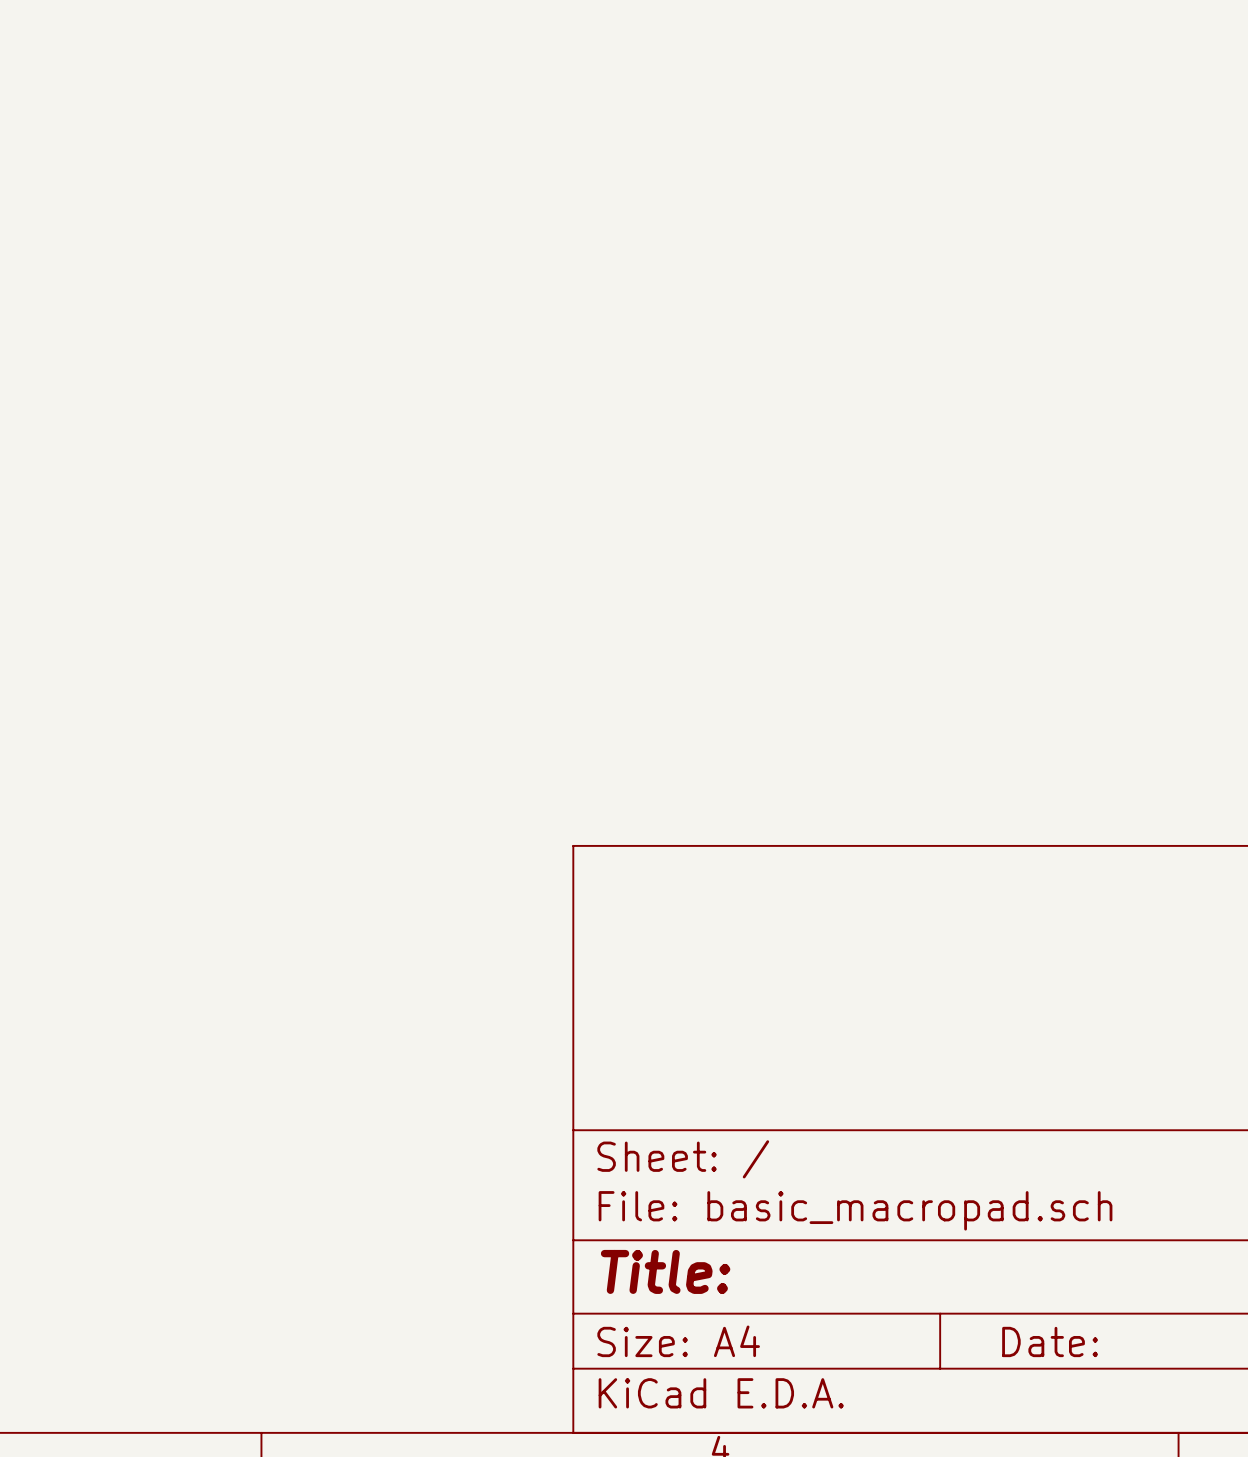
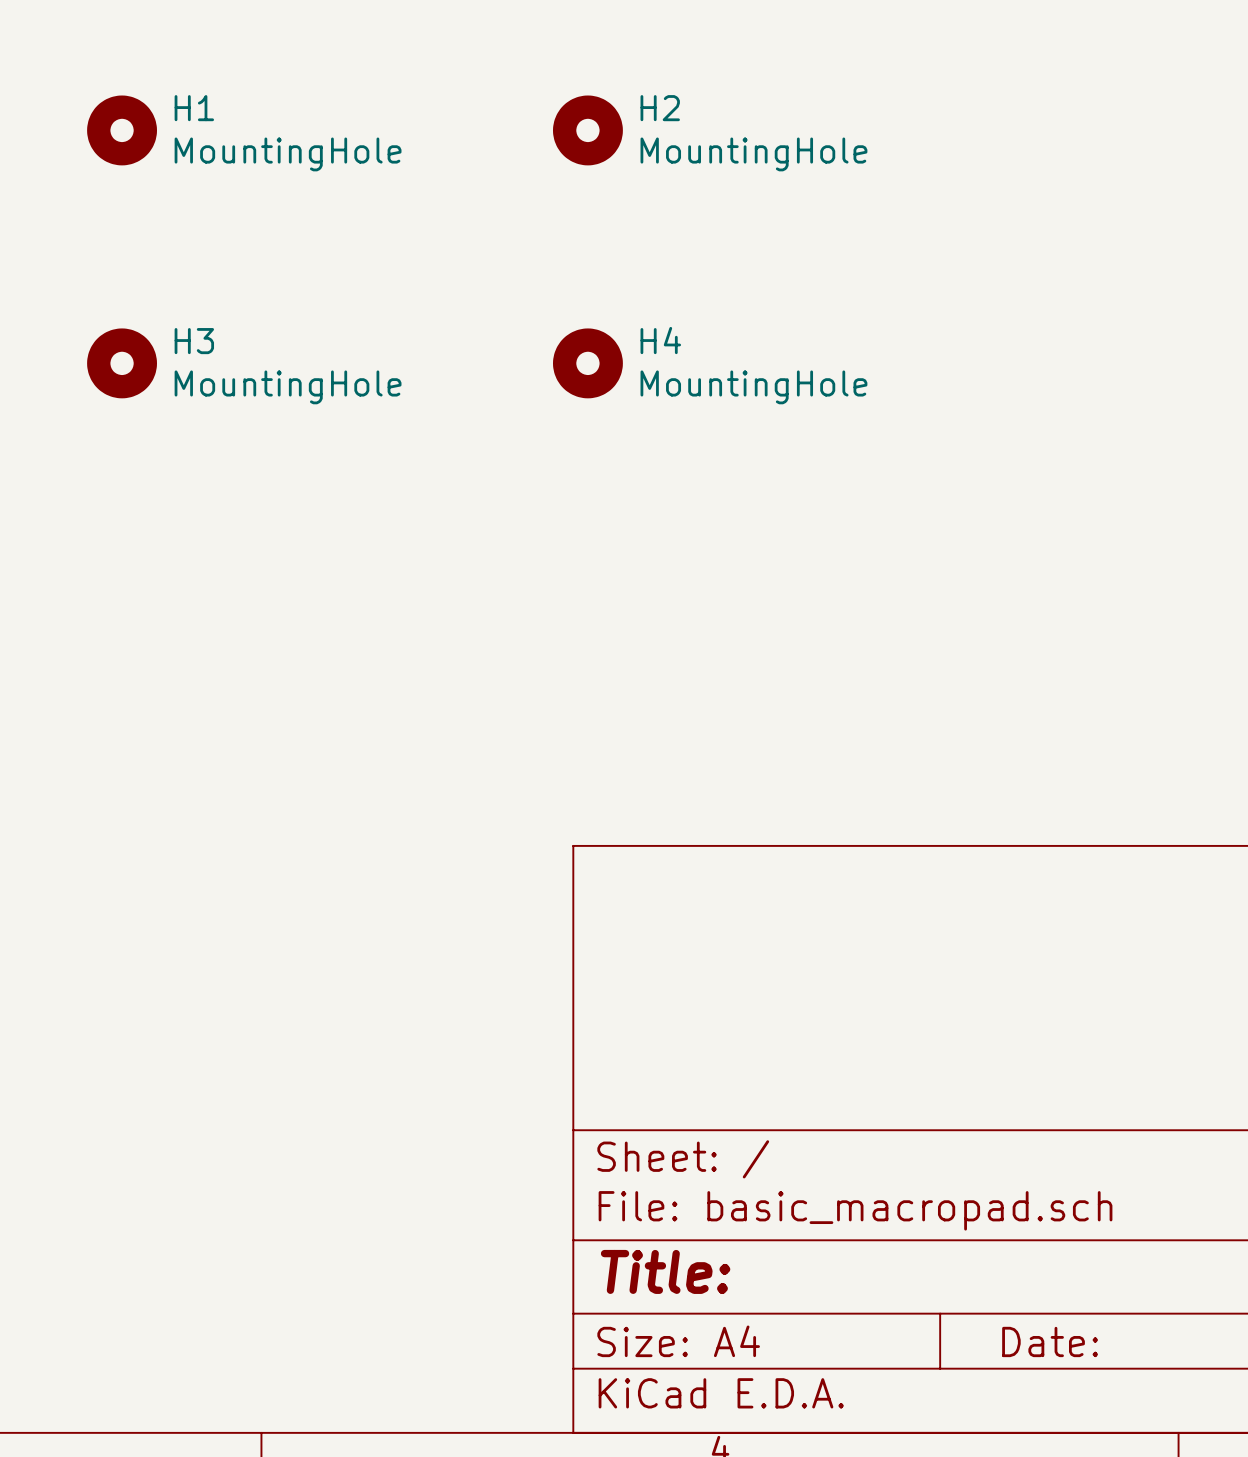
H1: none -> MountingHole (122, 130)
H2: none -> MountingHole (587, 130)
H3: none -> MountingHole (122, 363)
H4: none -> MountingHole (587, 363)

